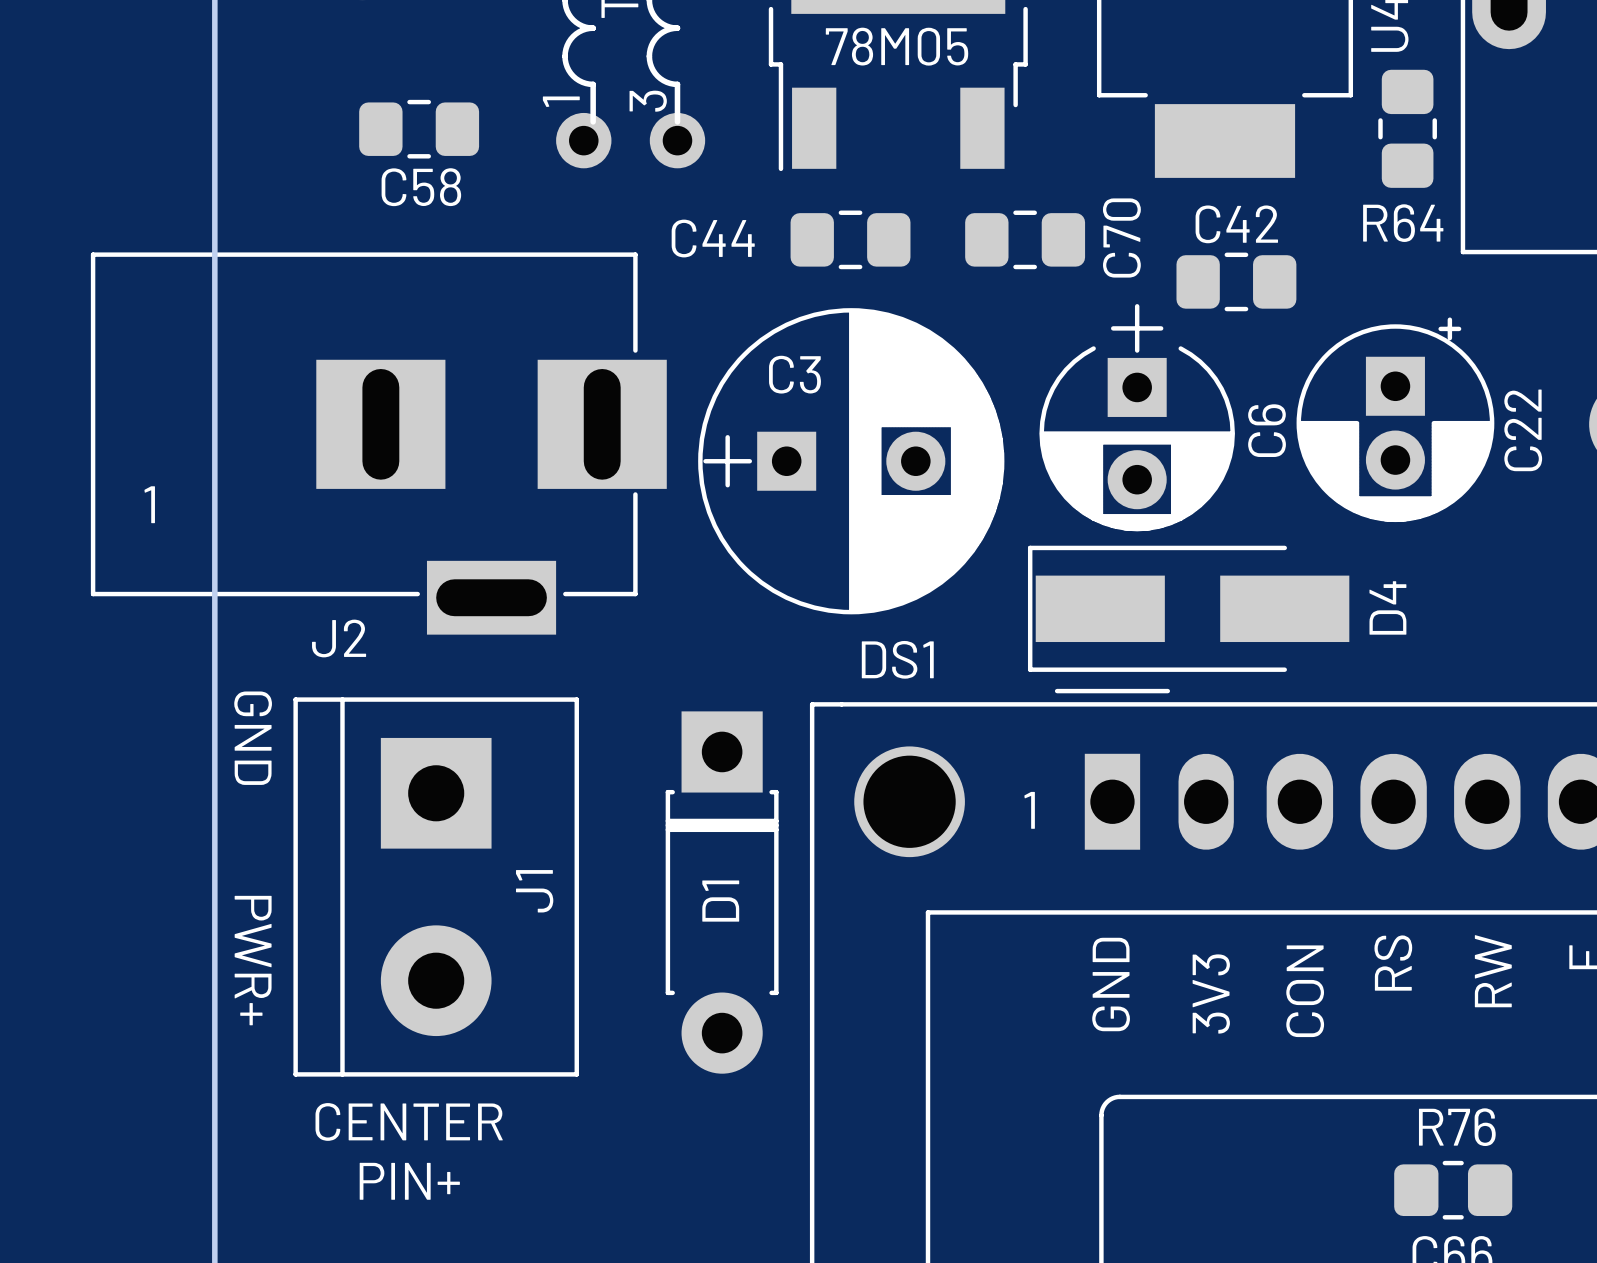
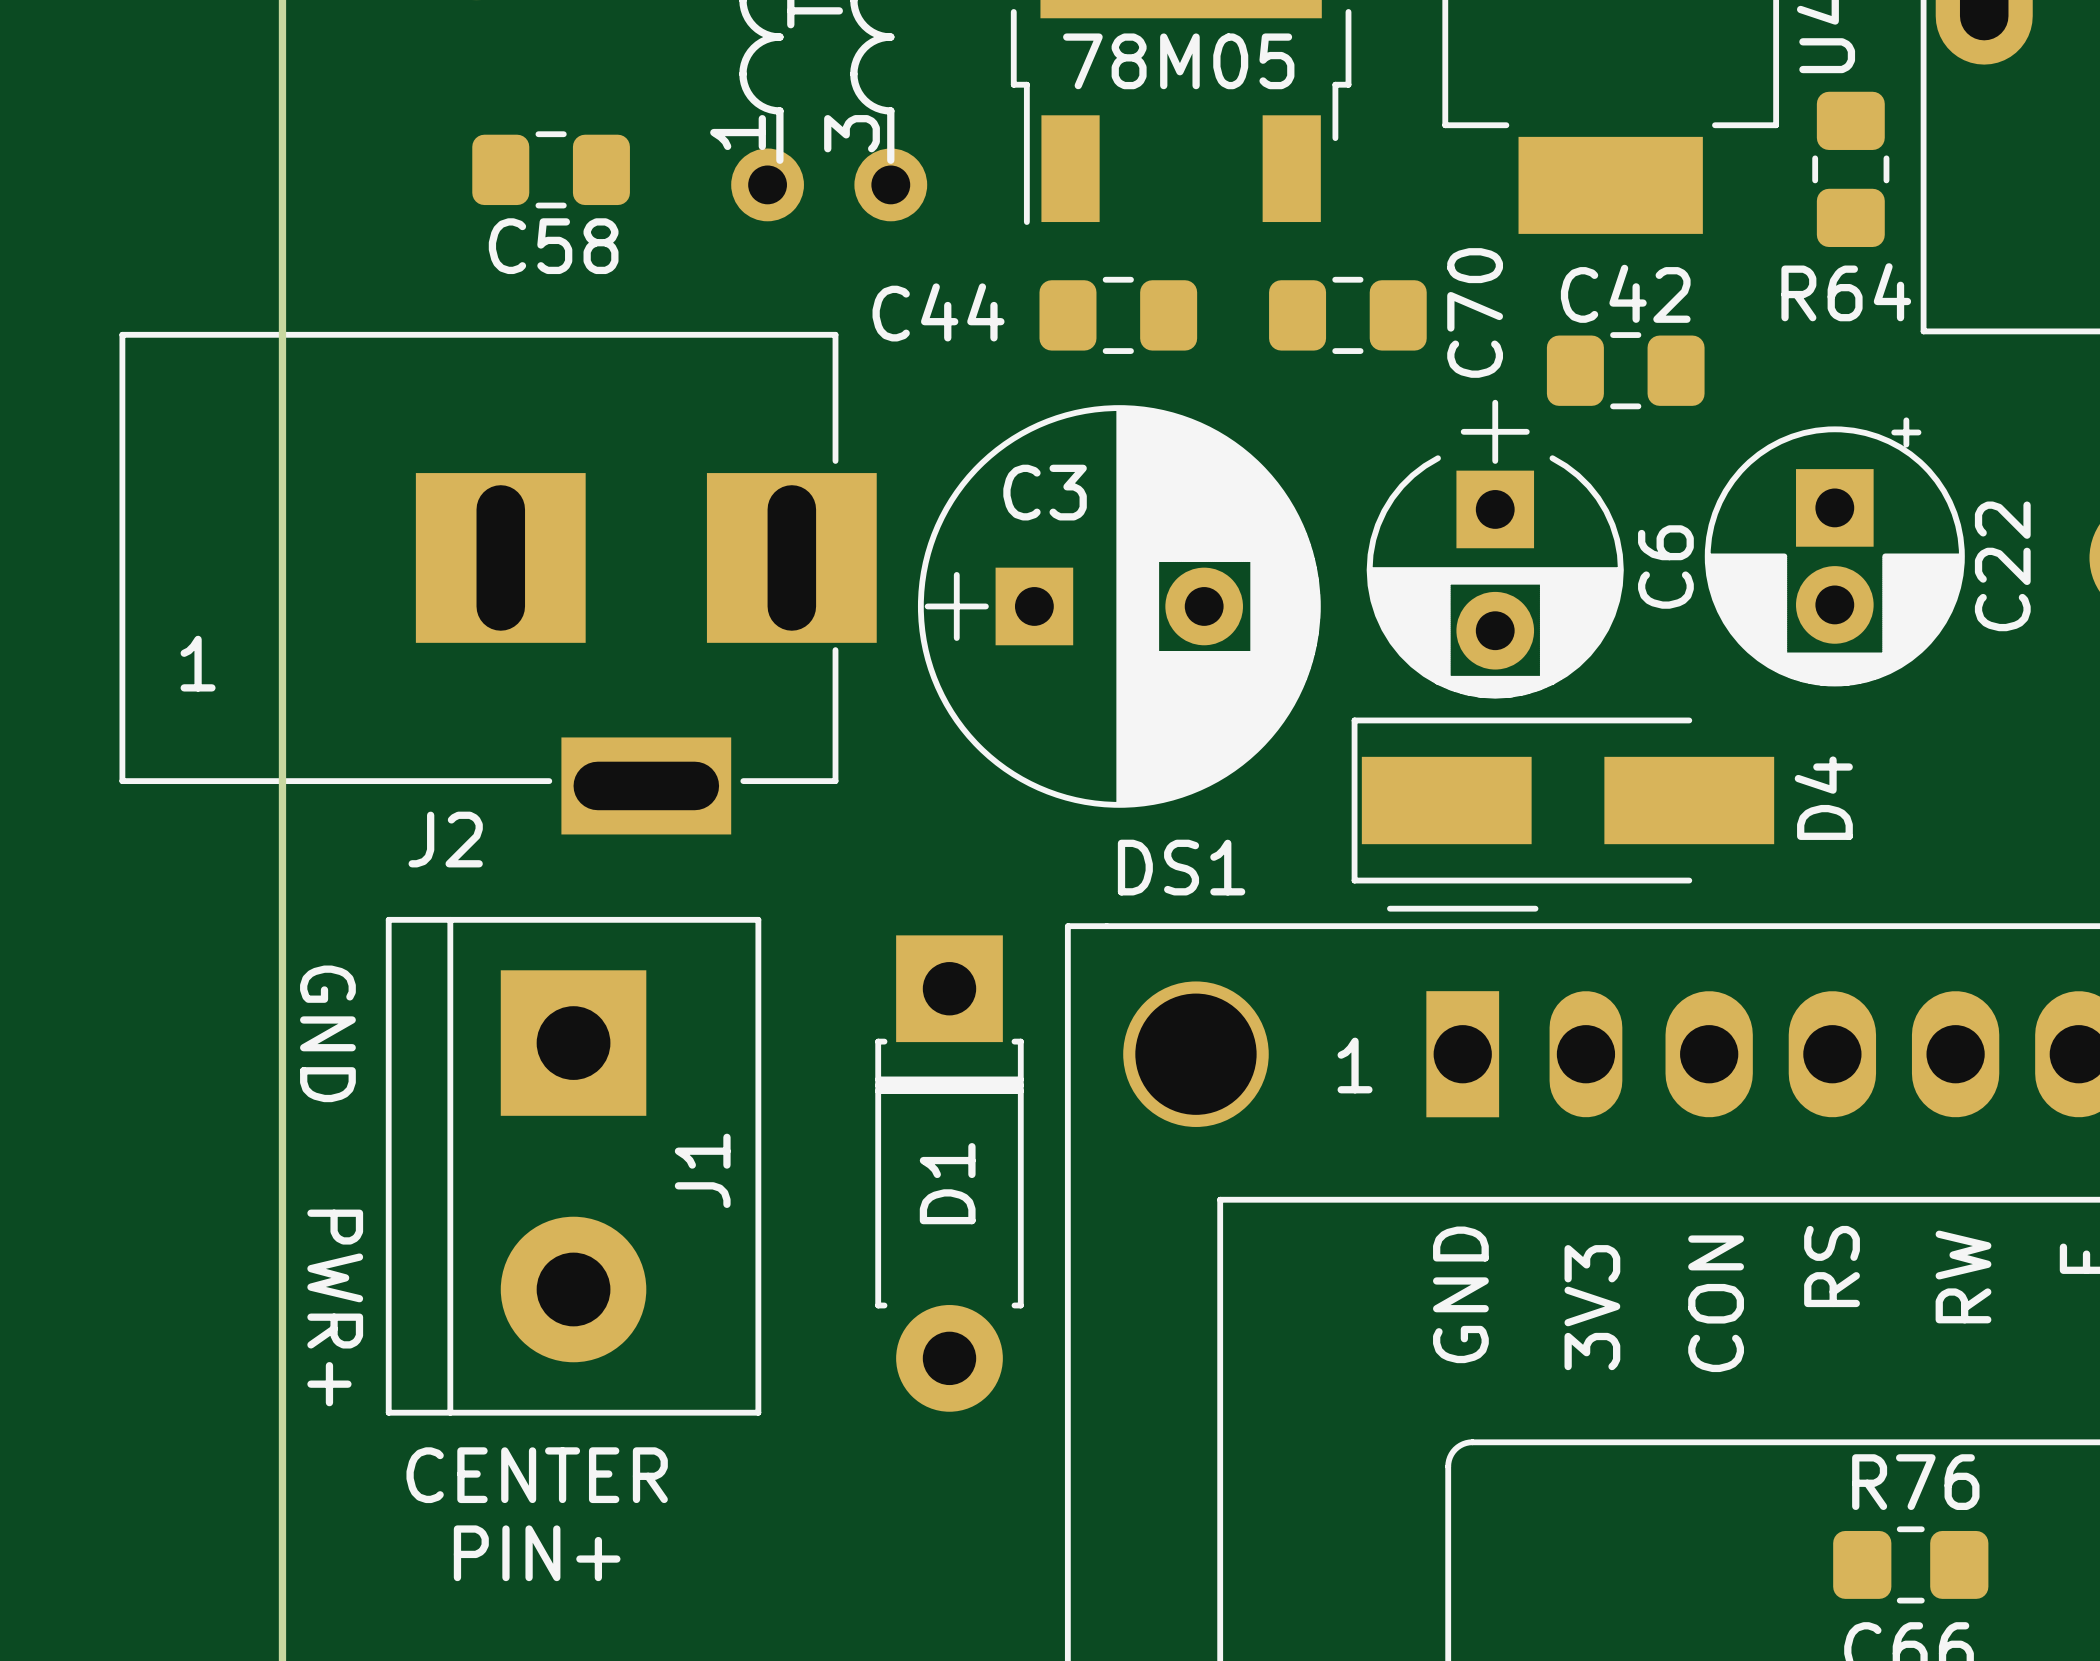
text position: GND (253, 738) -> GND (327, 1033)
text position: PWR+ (253, 960) -> PWR+ (335, 1307)

